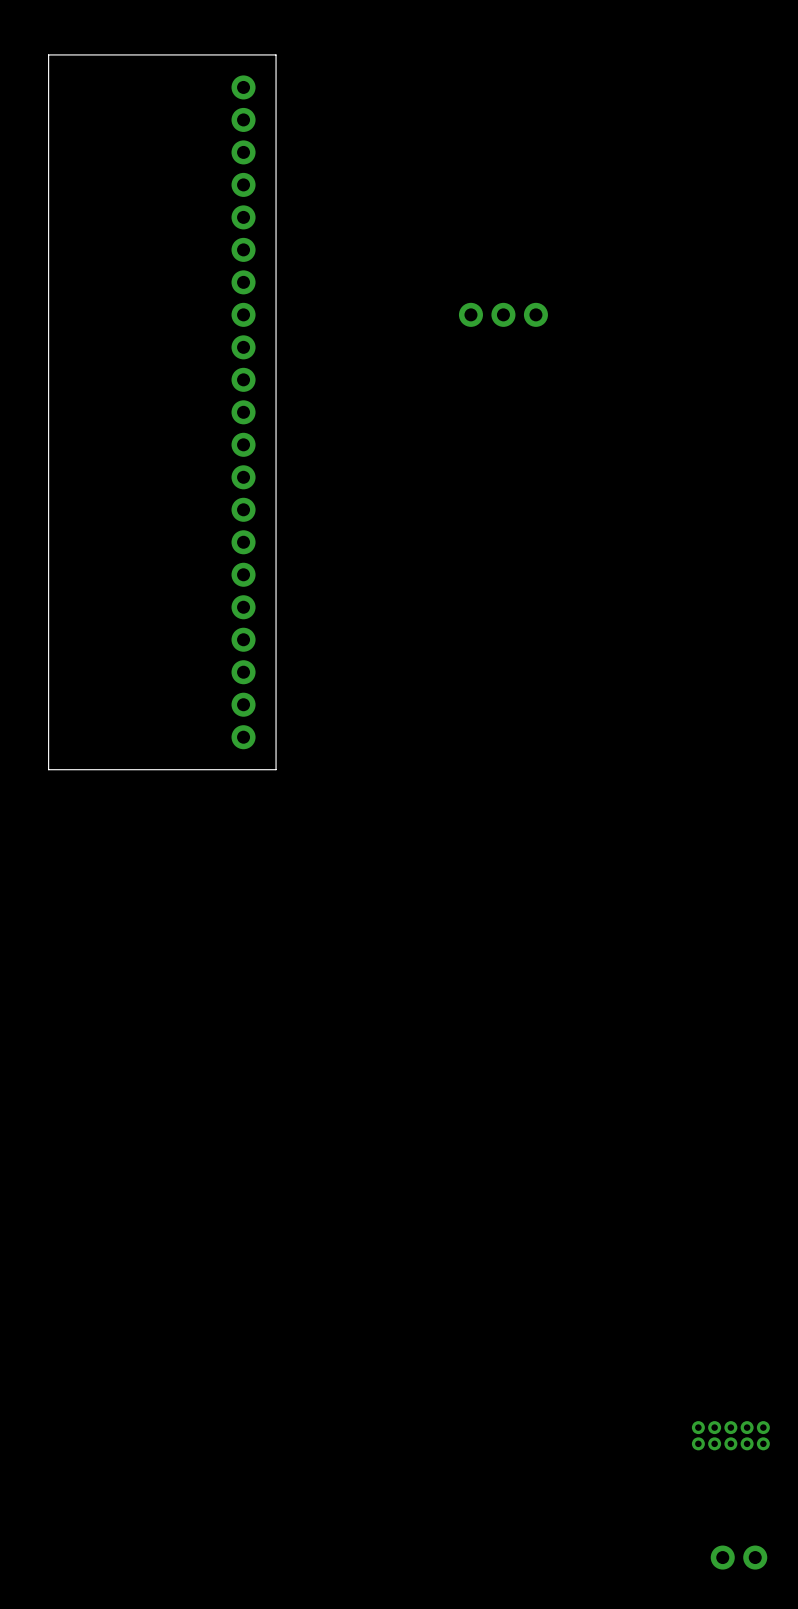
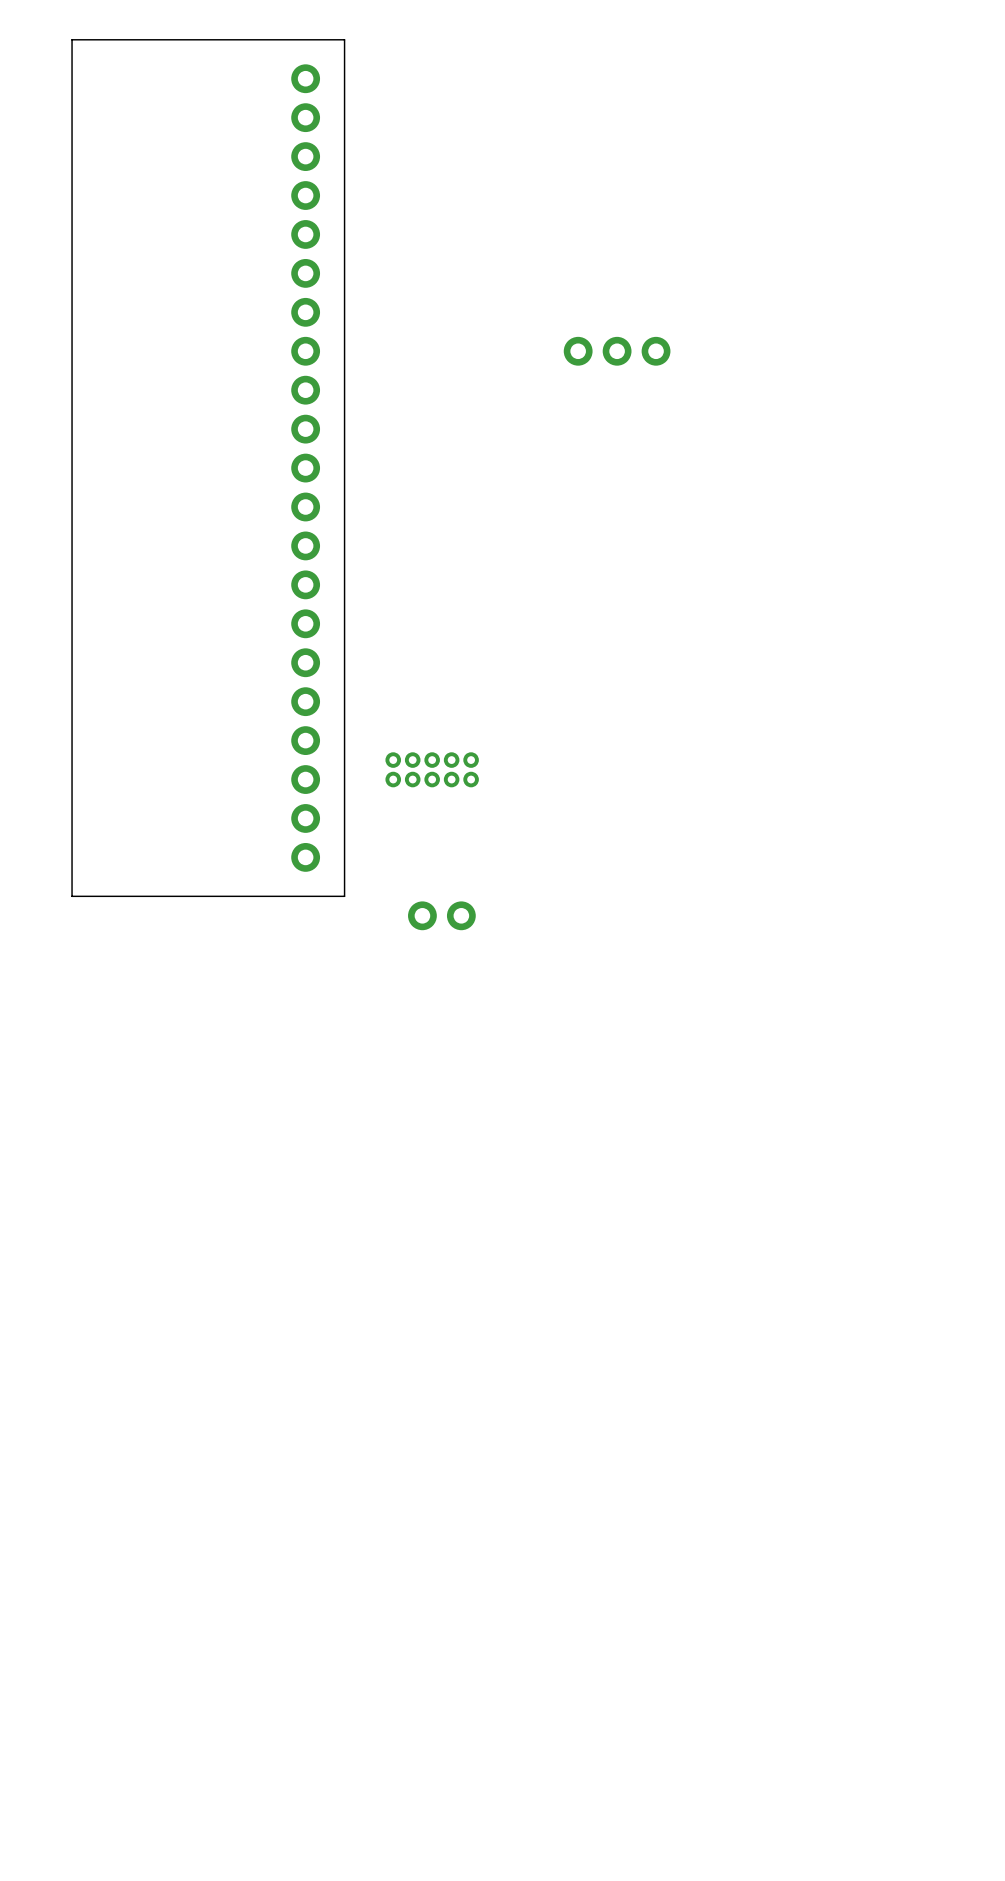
part: none -> (432, 769)
part: none -> (441, 915)
part: (730, 1435) -> none
part: (738, 1557) -> none

